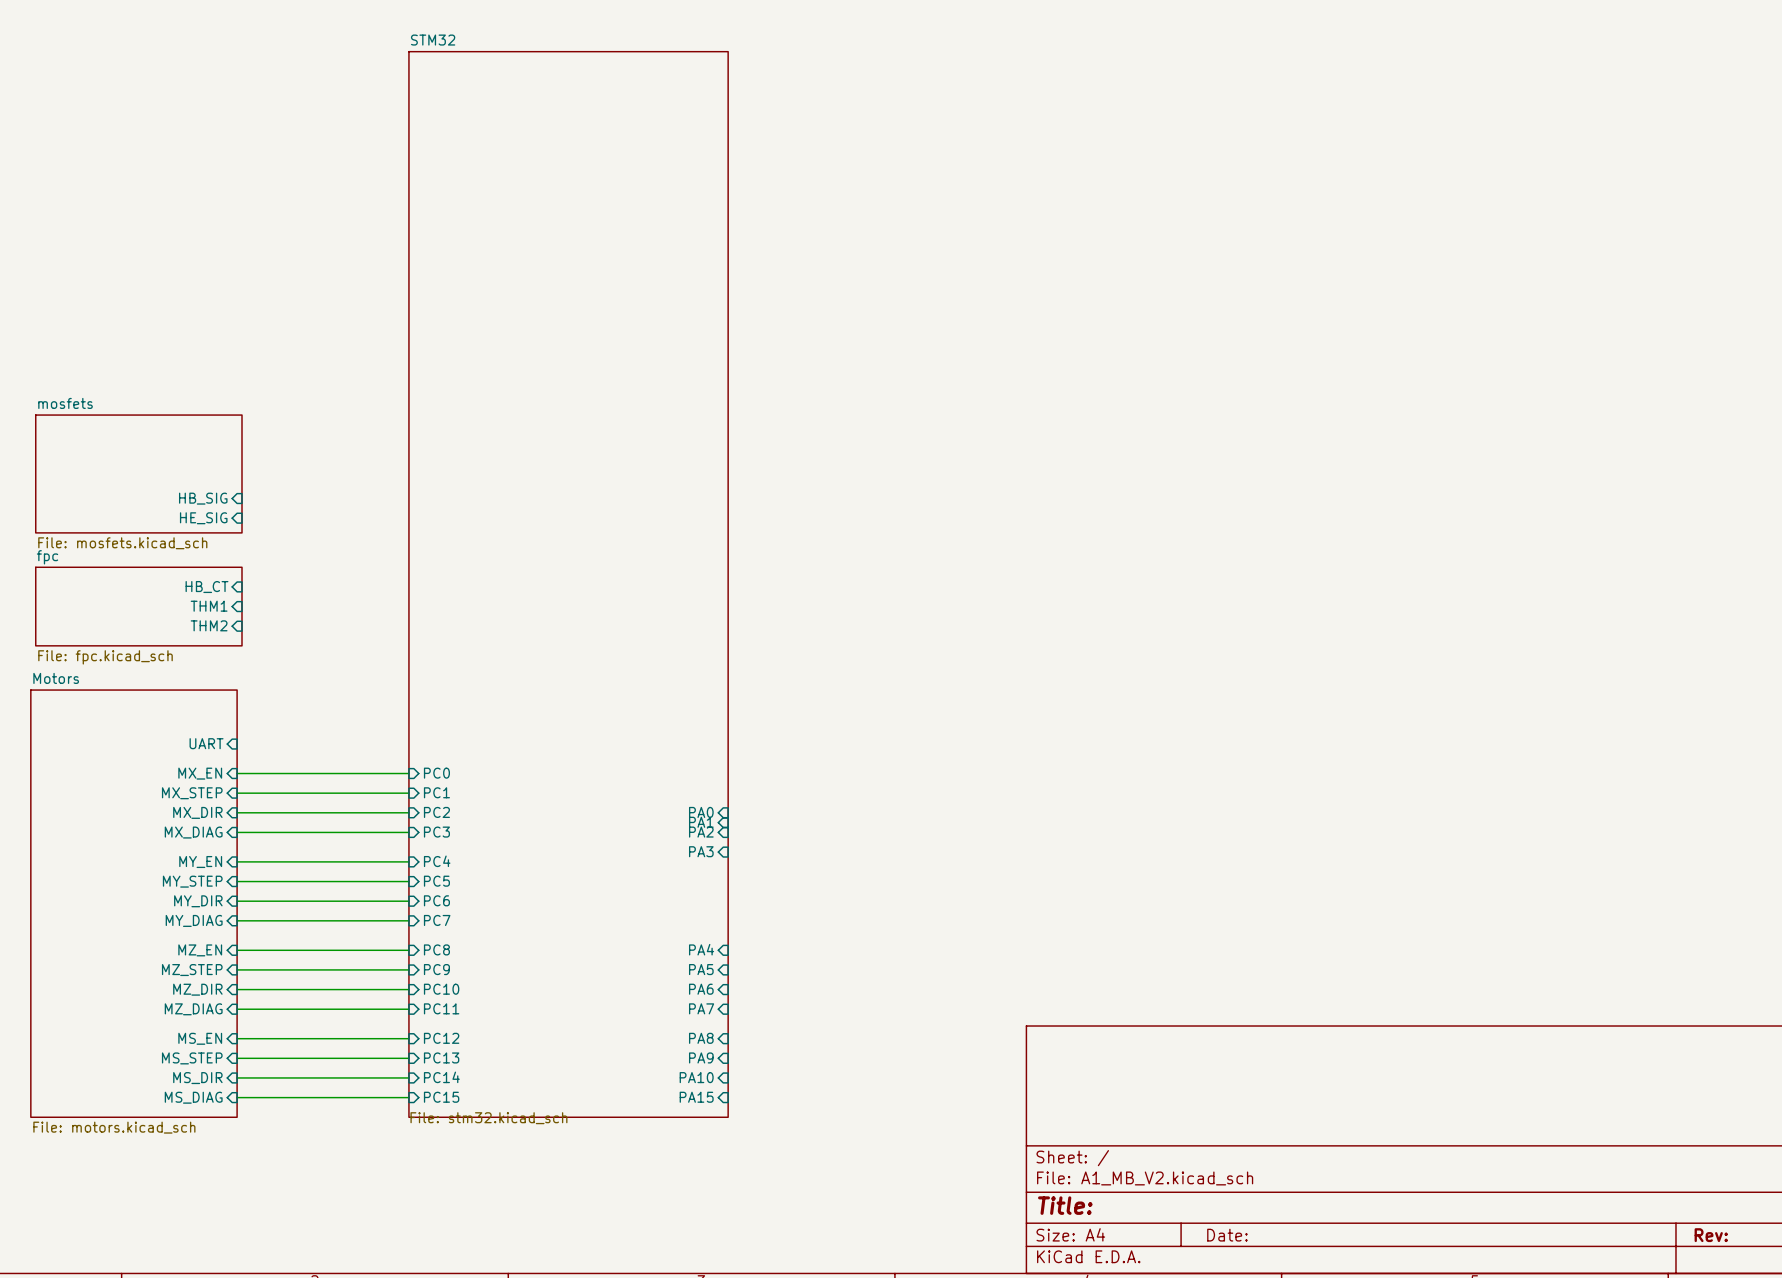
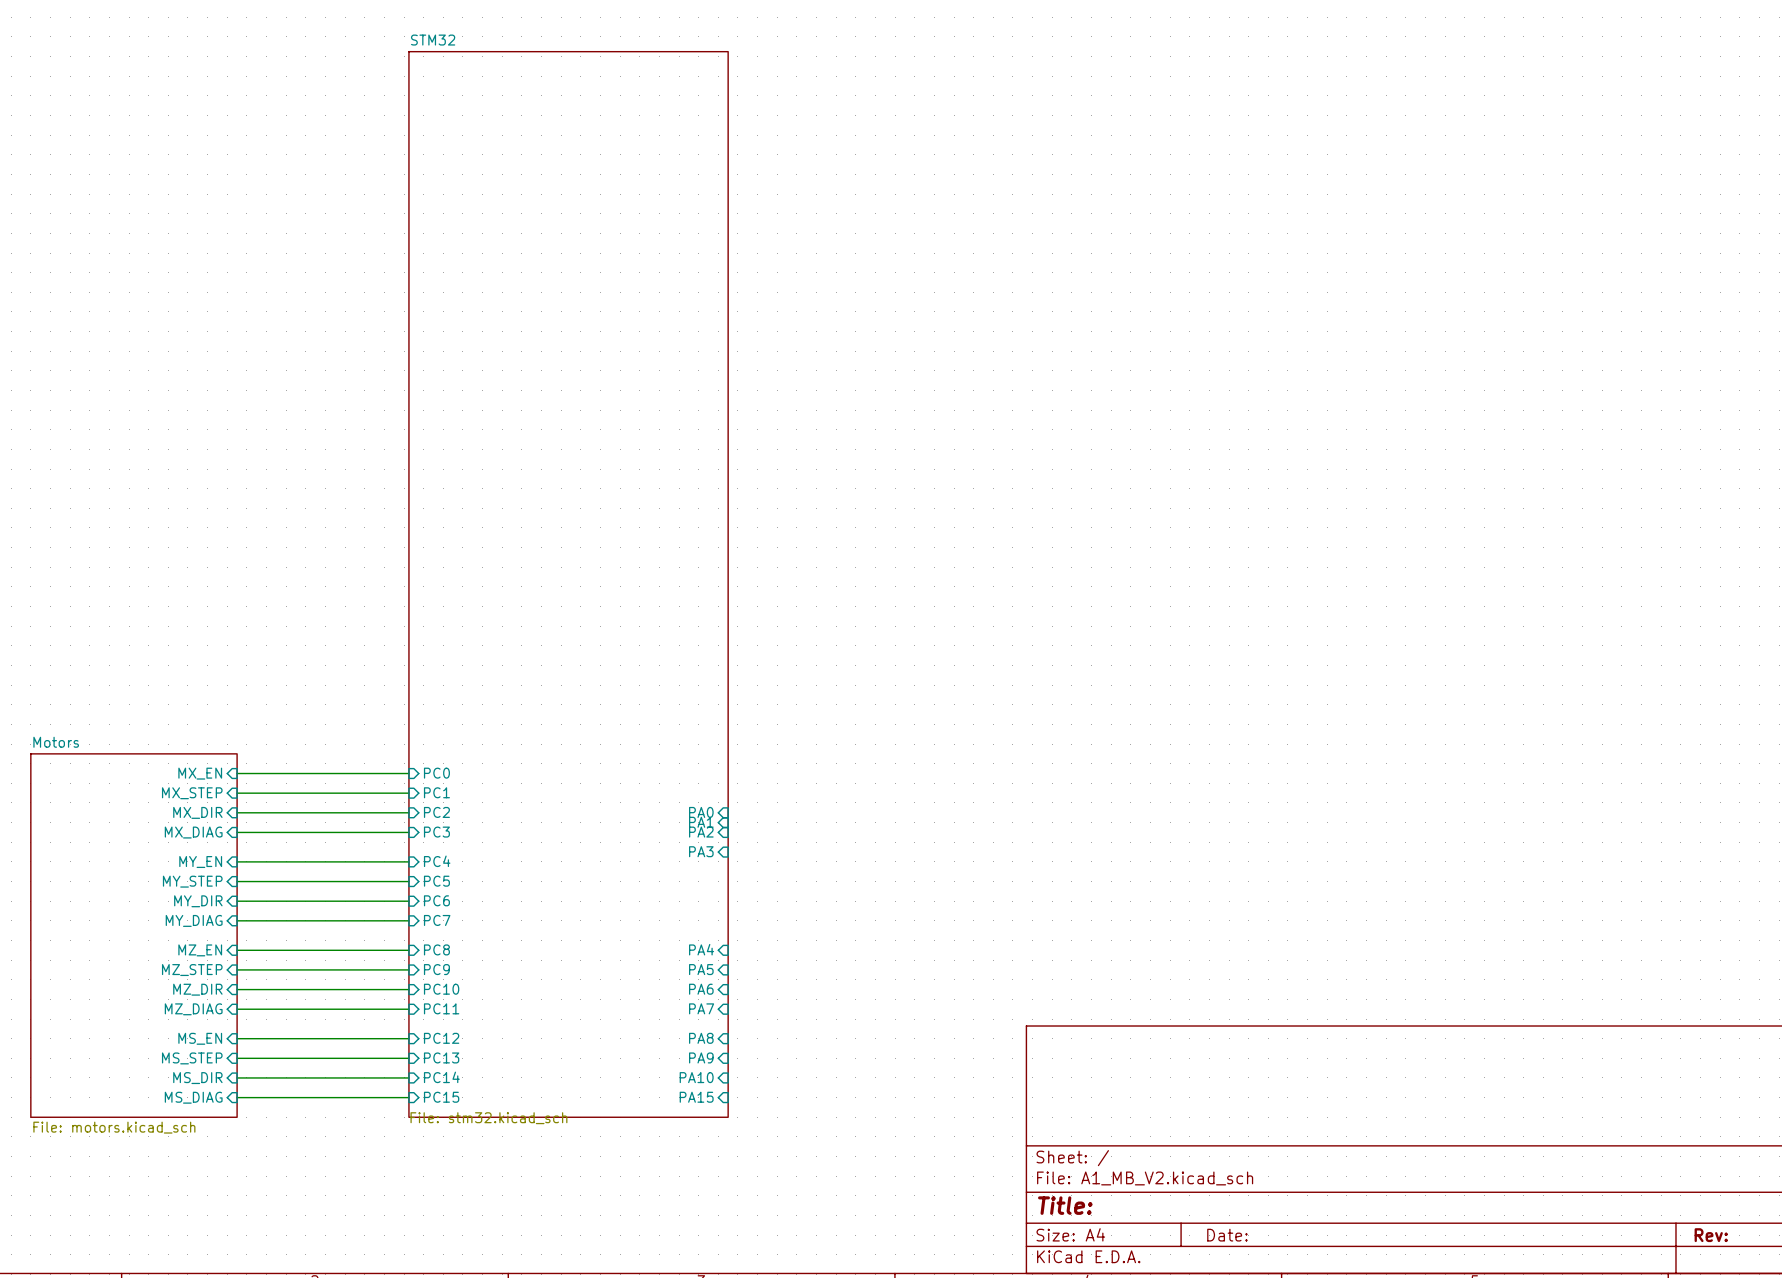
sheet mosfets: File: mosfets.kicad_sch (138, 473) -> none
sheet pin: HB_SIG (203, 498) -> none
sheet pin: HE_SIG (203, 518) -> none
sheet pin: HB_CT (207, 587) -> none
sheet fpc: File: fpc.kicad_sch (138, 606) -> none
sheet pin: THM1 (209, 606) -> none
sheet pin: THM2 (209, 625) -> none
sheet pin: UART (206, 743) -> none
sheet Motors: File: motors.kicad_sch (133, 903) -> none
sheet Motors: none -> File: motors.kicad_sch (133, 935)

